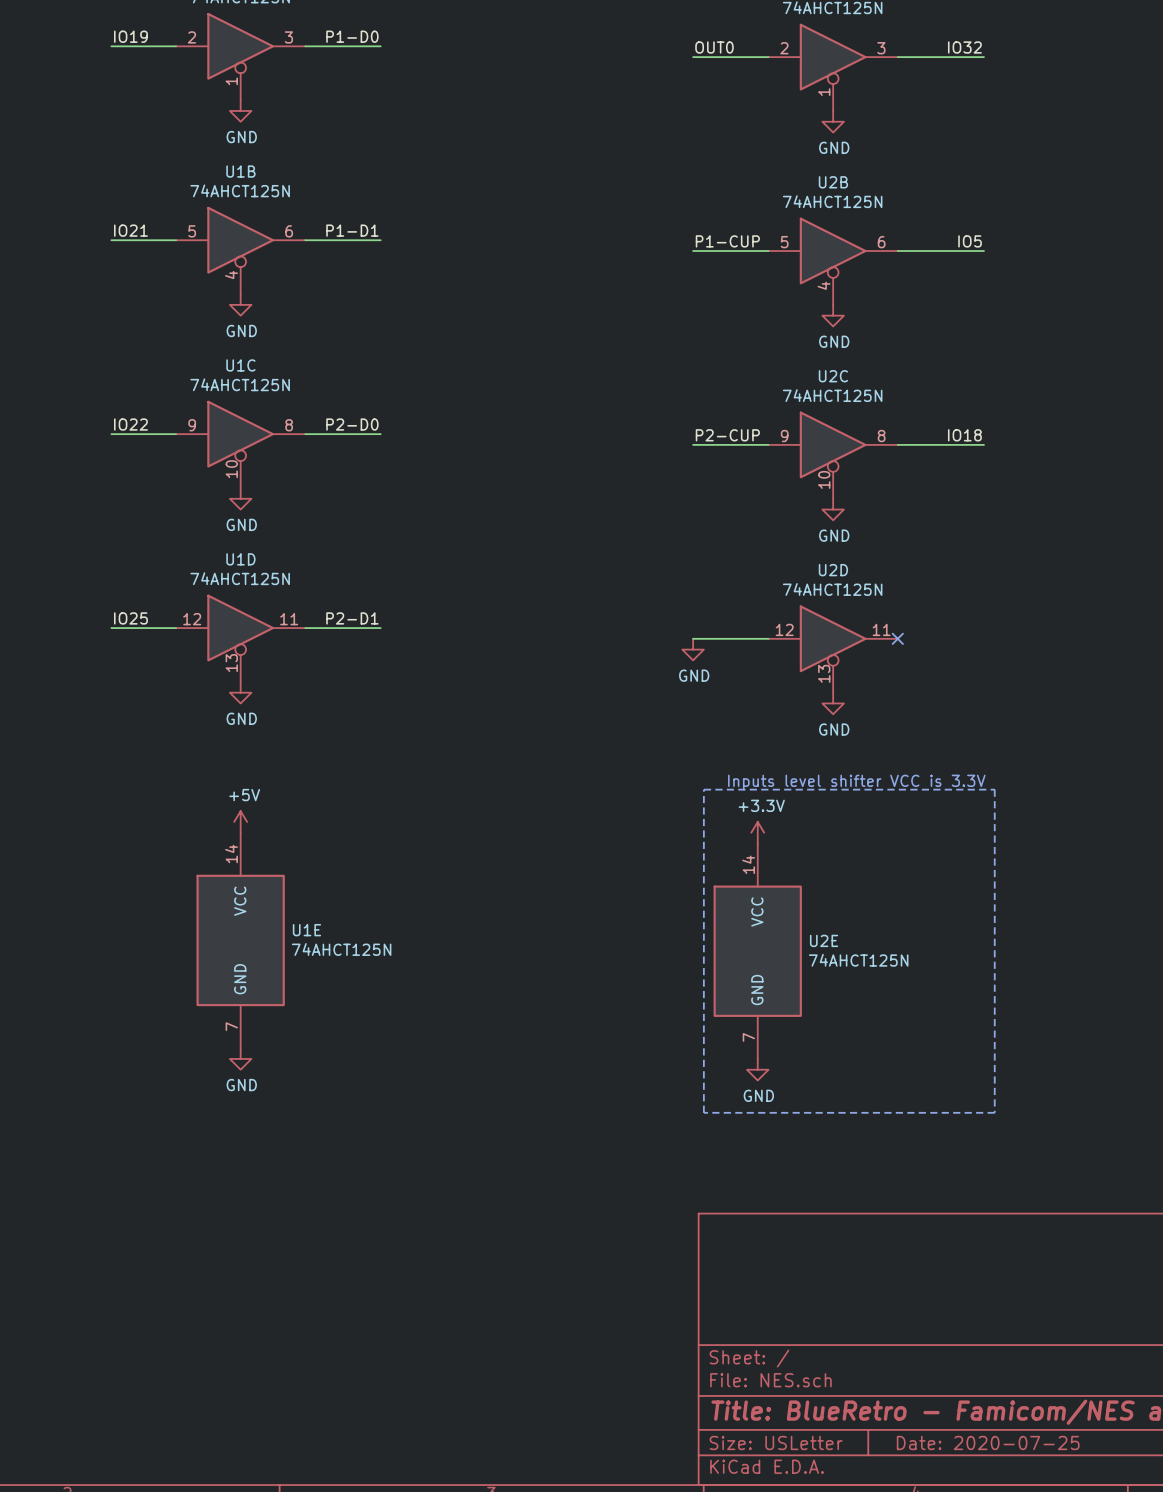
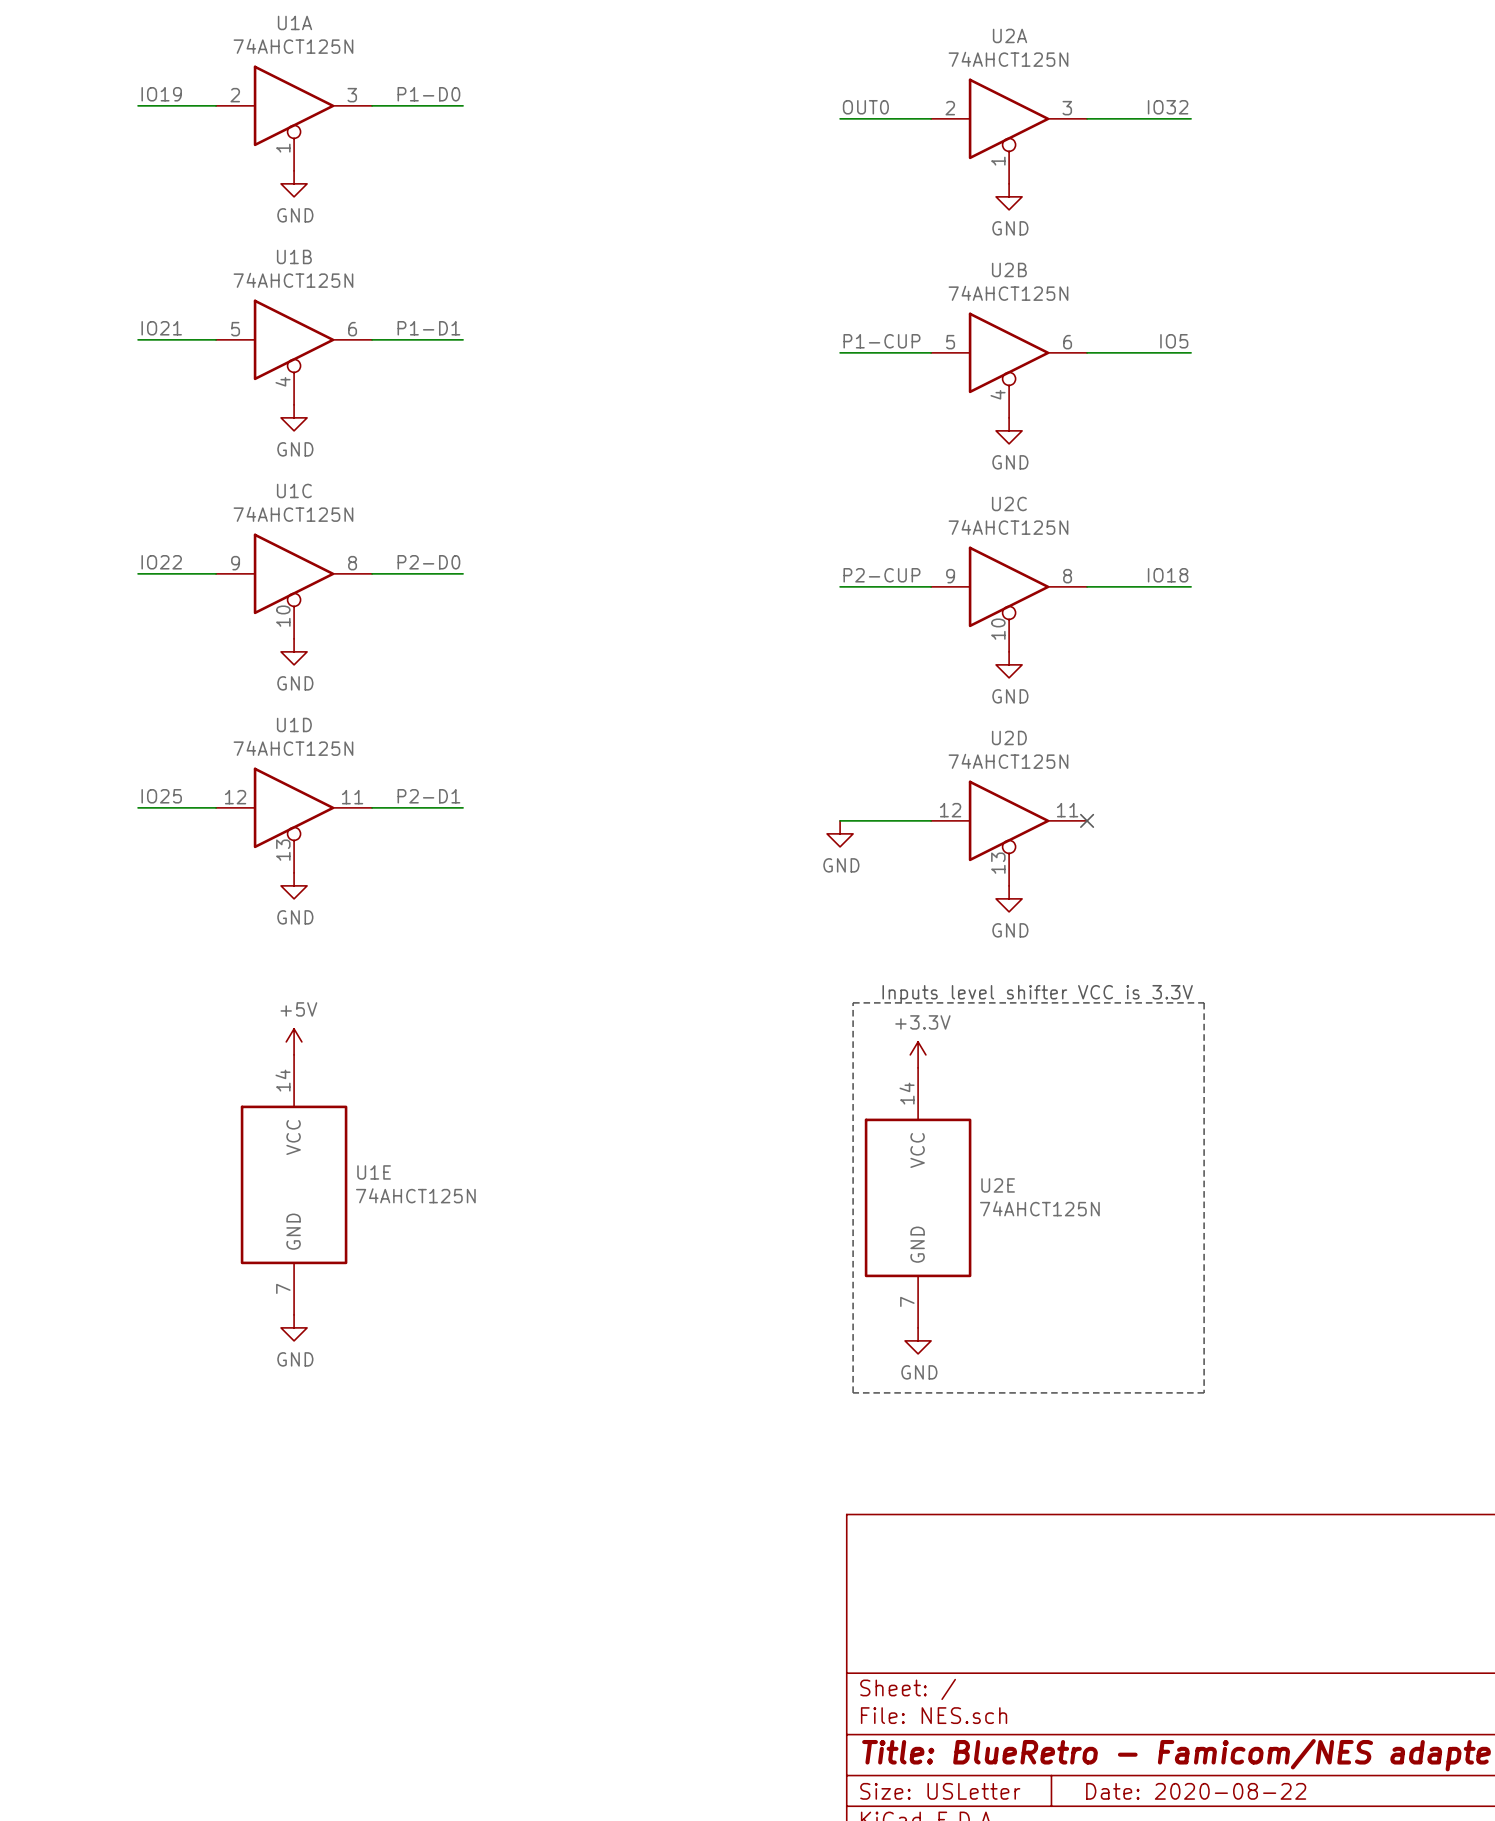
title block: Date: 2020-07-25 (988, 1442) -> Date: 2020-08-22 (1196, 1791)

